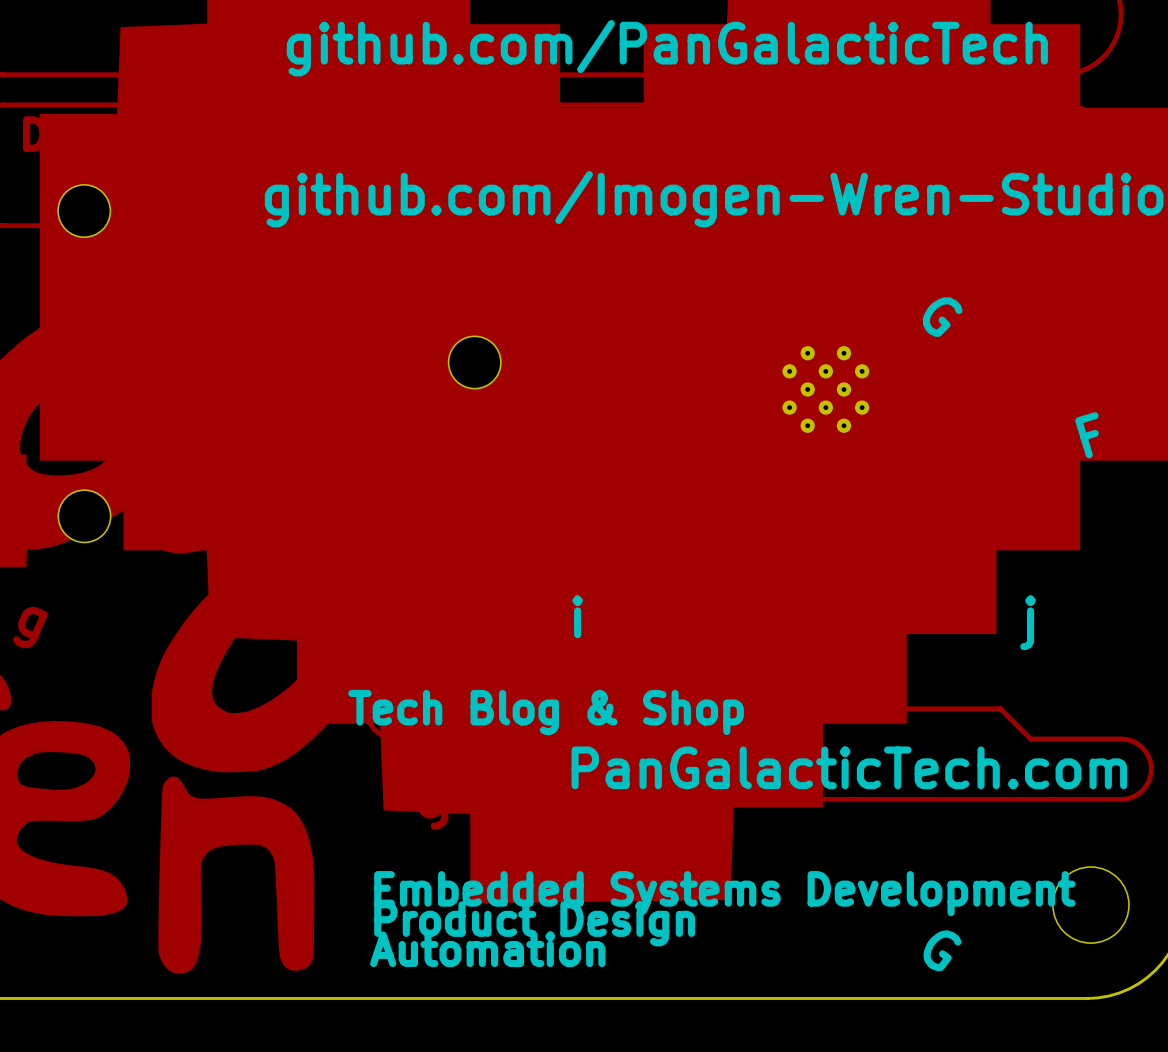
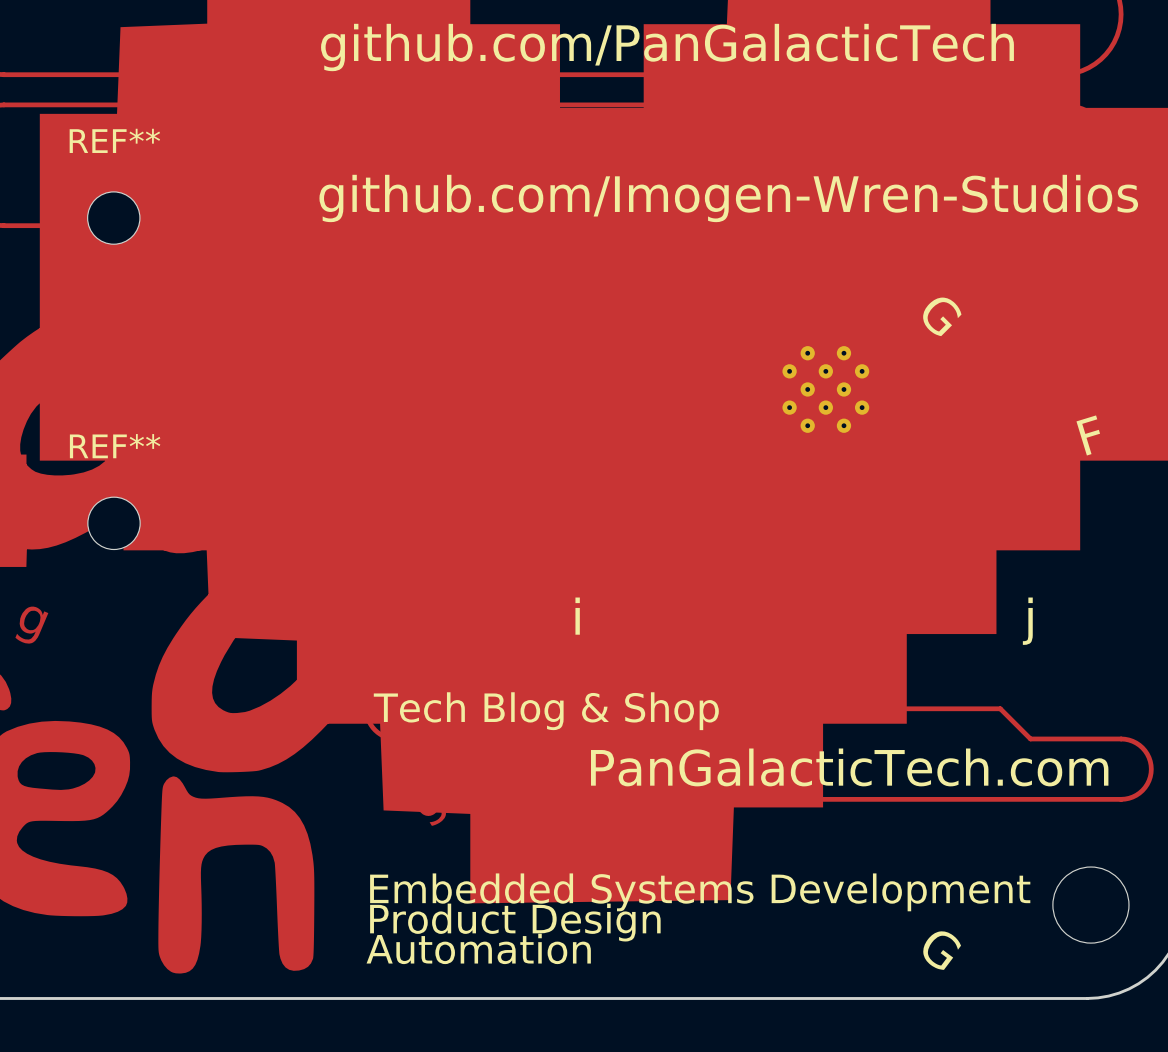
part: (84, 211) -> none
REF**: none -> (113, 218)
part: (474, 362) -> none
part: (84, 516) -> none
REF**: none -> (114, 523)

